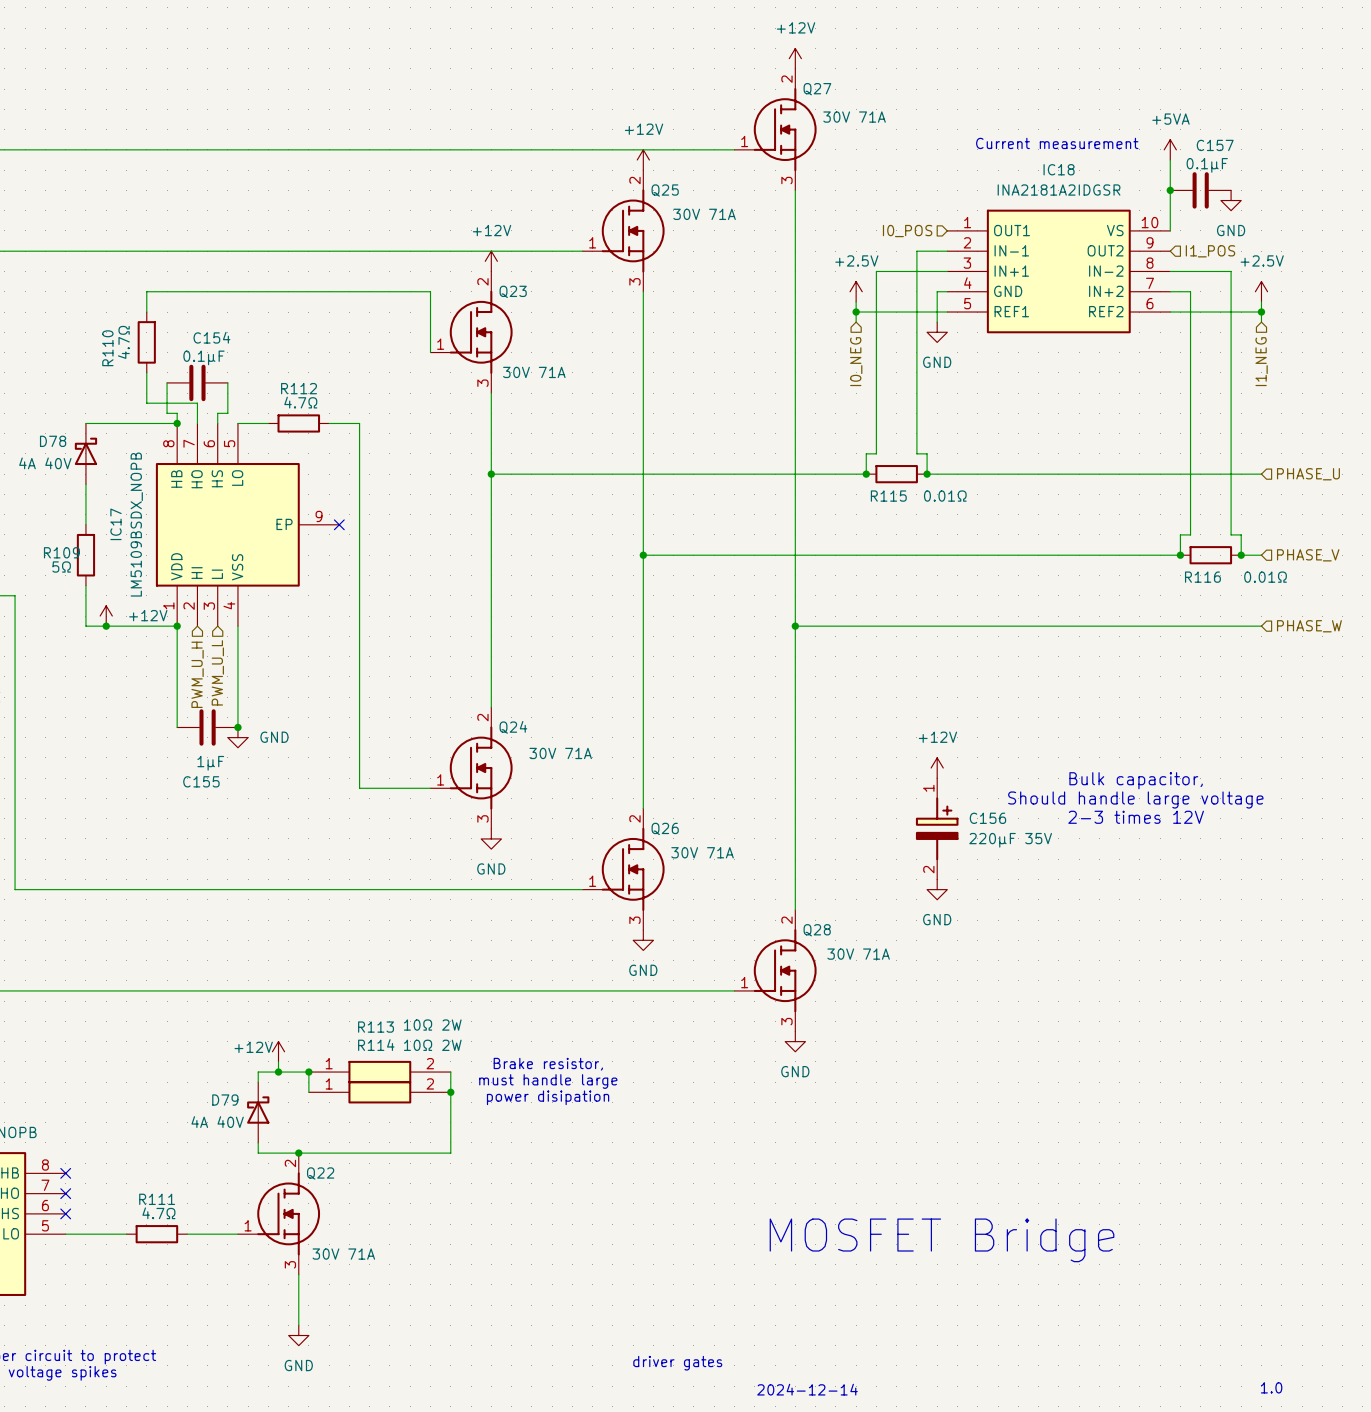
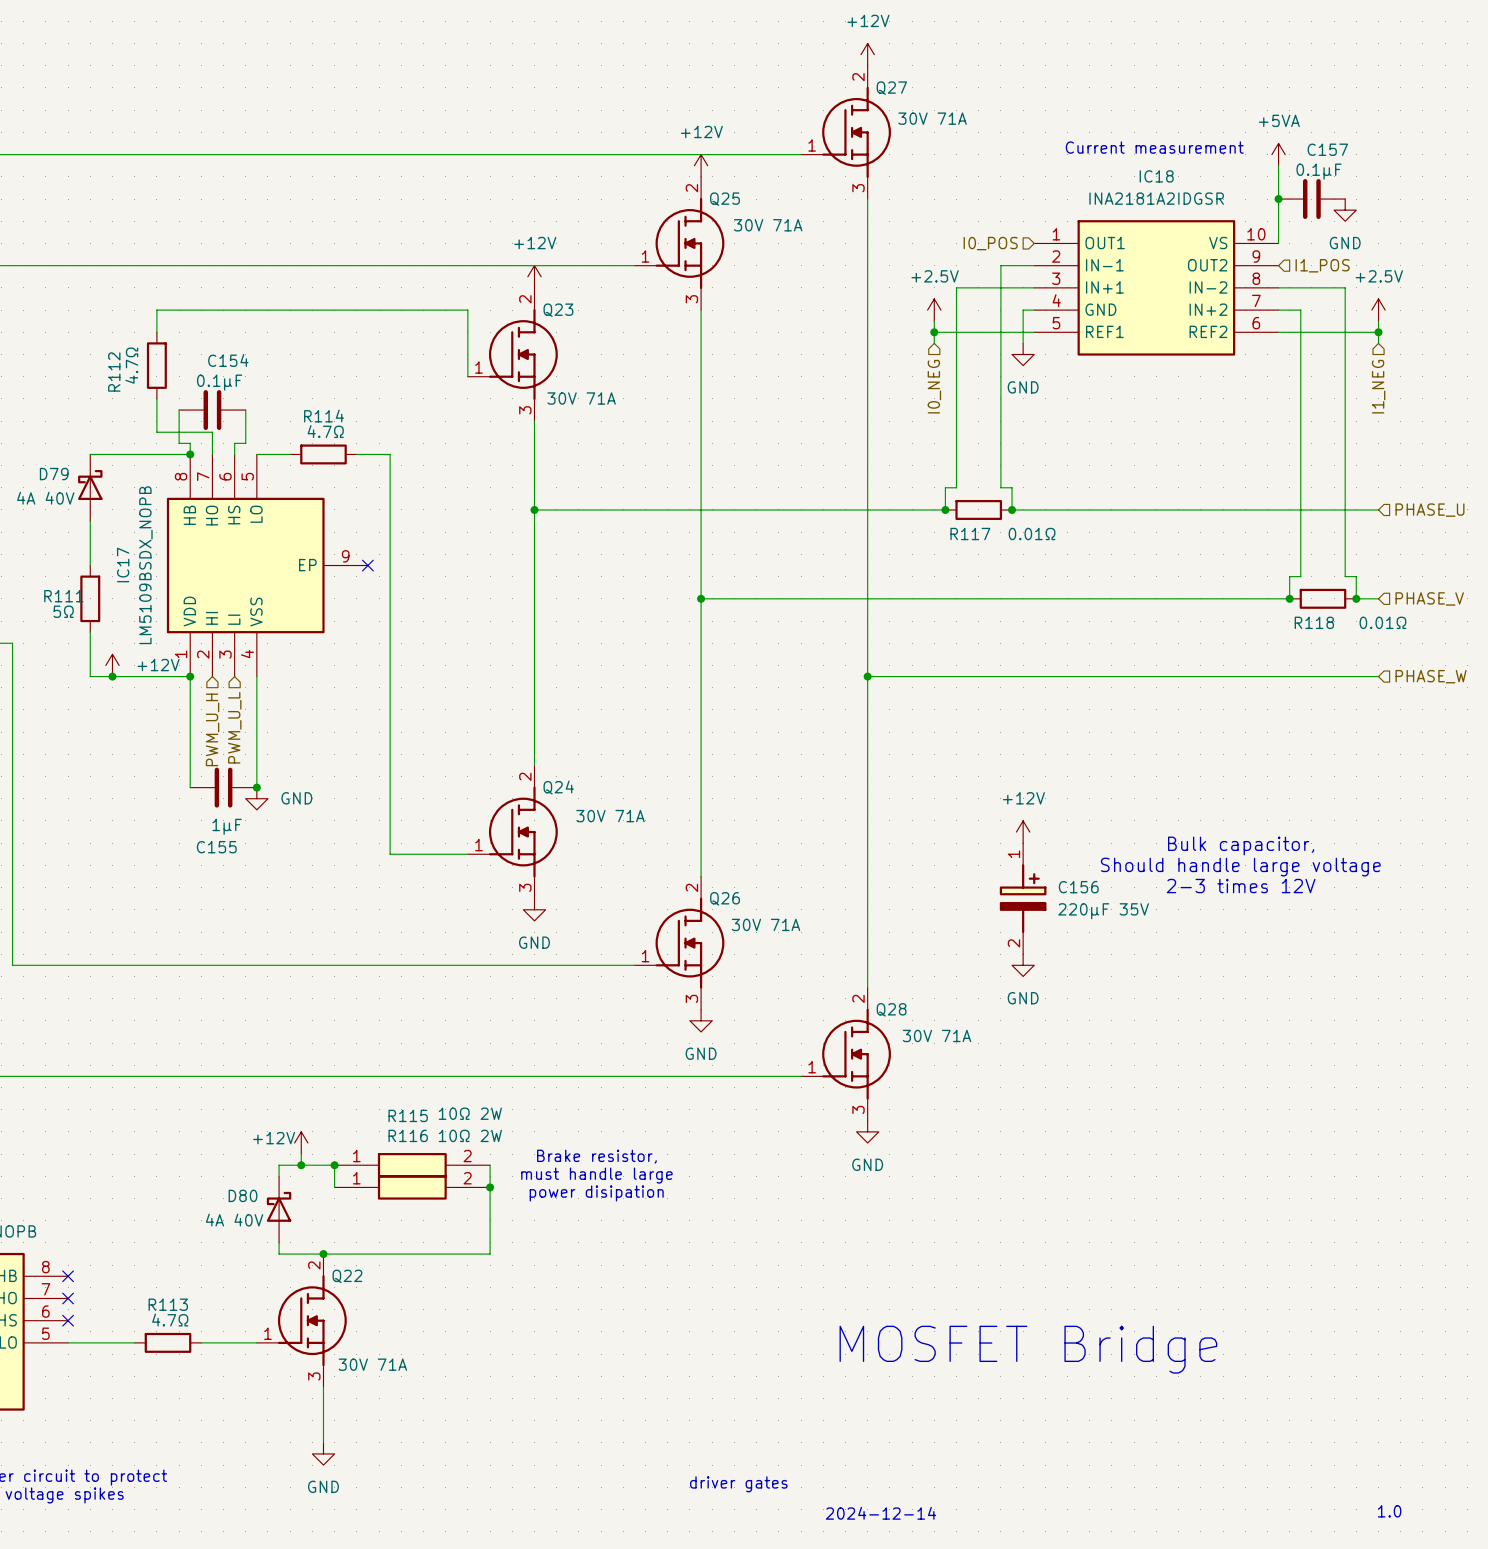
R110 name: R110 (107, 348) -> R112 (114, 372)
R112 name: R112 (299, 388) -> R114 (324, 416)
D78 name: D78 (53, 441) -> D79 (54, 474)
R115 name: R115 (888, 496) -> R117 (970, 534)
R109 name: R109 (61, 552) -> R111 (63, 596)
R116 name: R116 (1202, 577) -> R118 (1314, 622)
R113 name: R113 (376, 1027) -> R115 (408, 1115)
R114 name: R114 (376, 1045) -> R116 (408, 1135)
D79 name: D79 (225, 1100) -> D80 (243, 1195)
R111 name: R111 (157, 1199) -> R113 (168, 1304)

